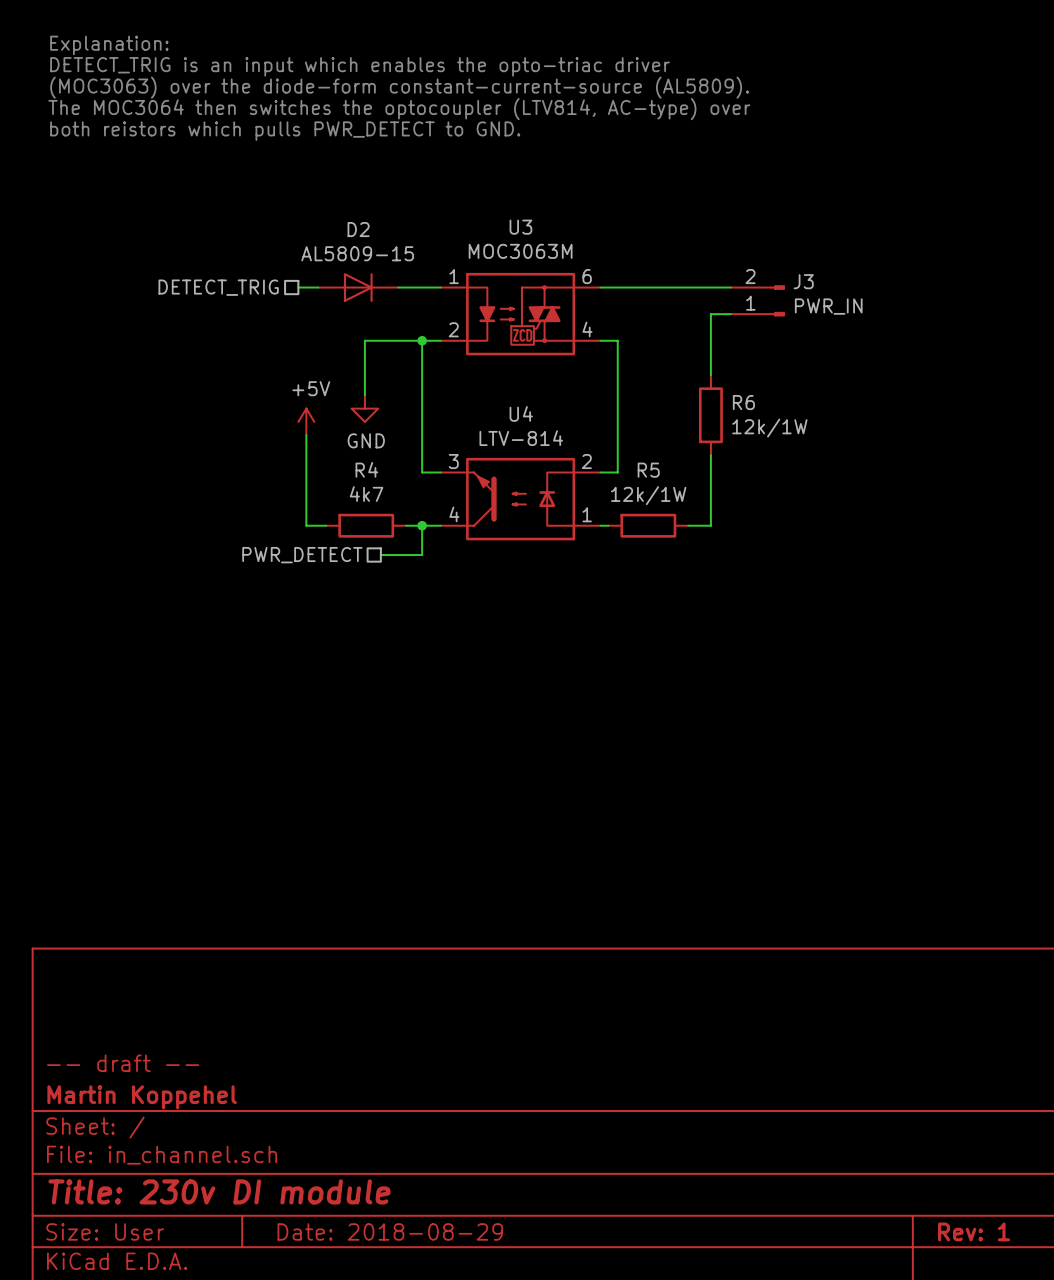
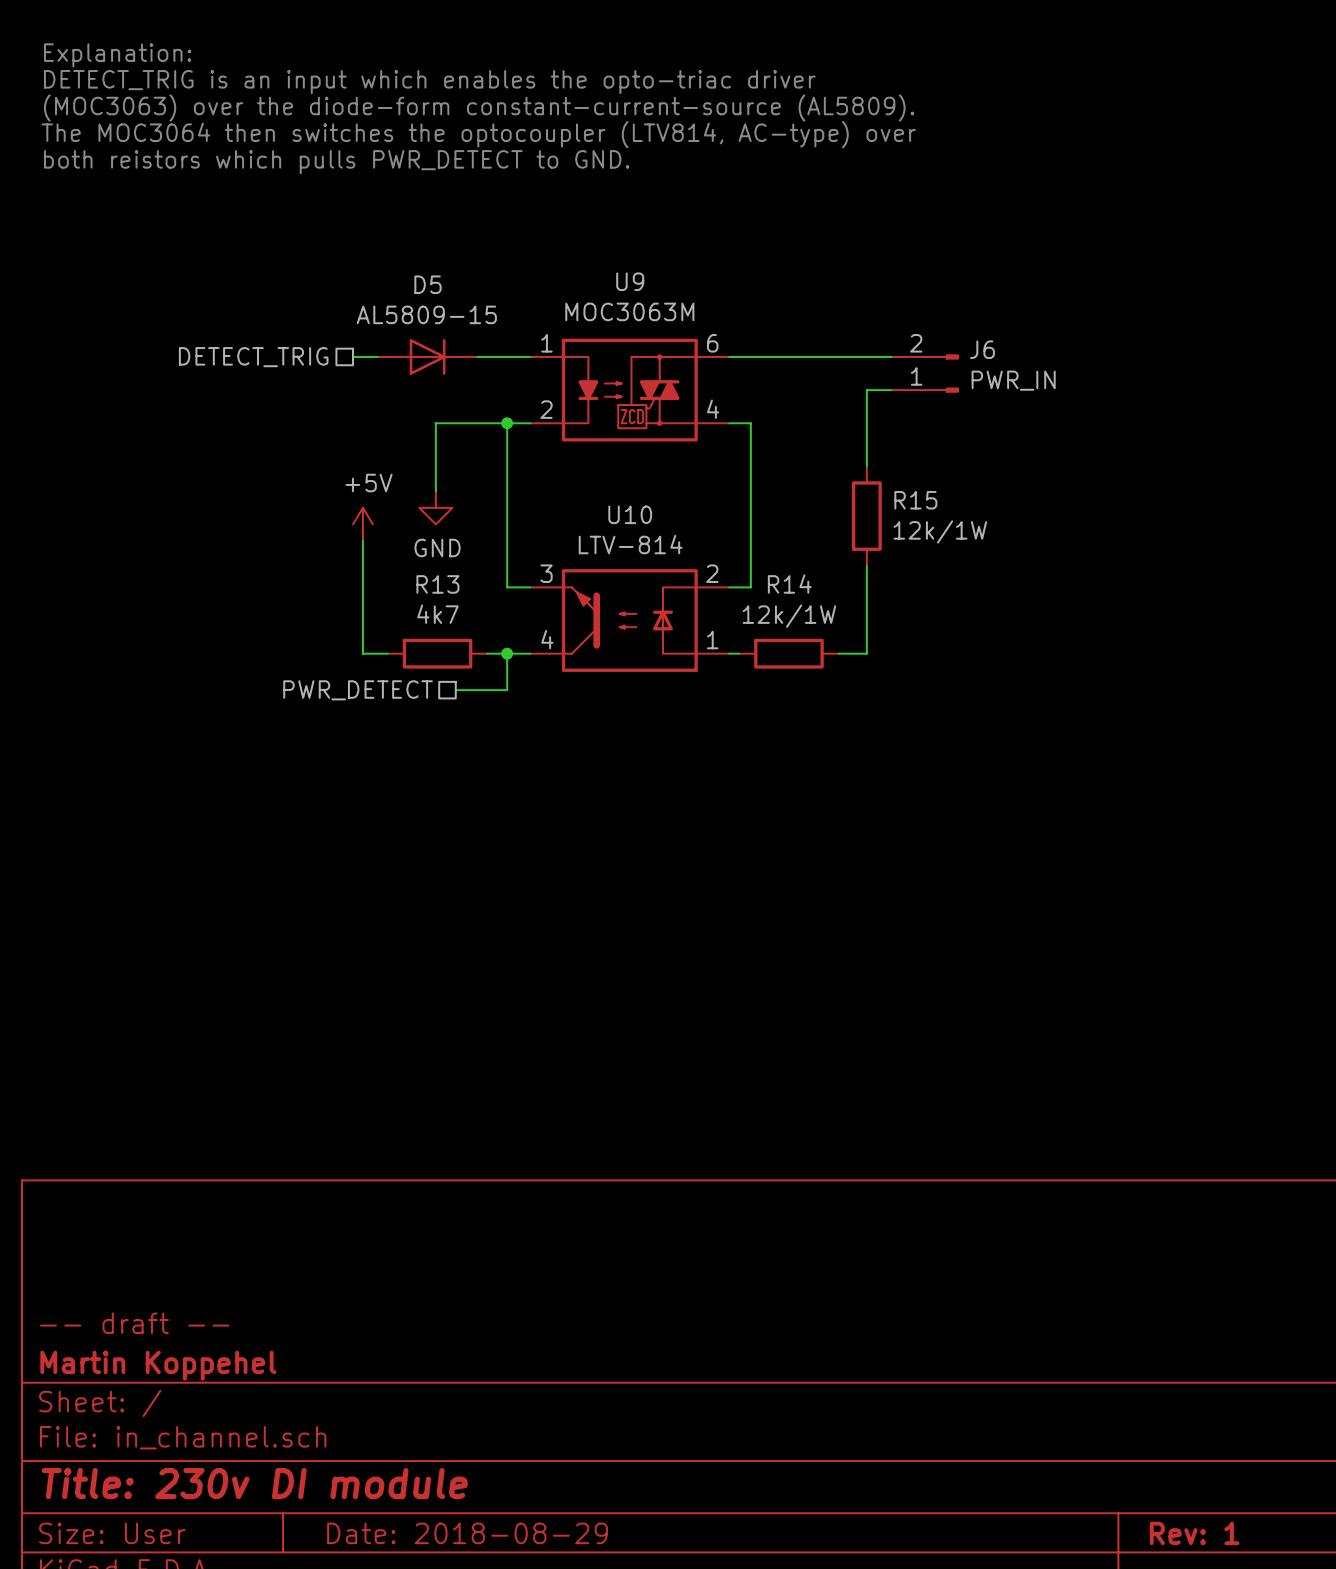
U3 name: U3 (520, 227) -> U9 (630, 281)
D2 name: D2 (358, 229) -> D5 (427, 284)
J3 name: J3 (803, 281) -> J6 (982, 349)
R6 name: R6 (743, 402) -> R15 (915, 500)
U4 name: U4 (521, 413) -> U10 (630, 514)
R4 name: R4 (366, 469) -> R13 (437, 584)
R5 name: R5 (648, 470) -> R14 (789, 584)

